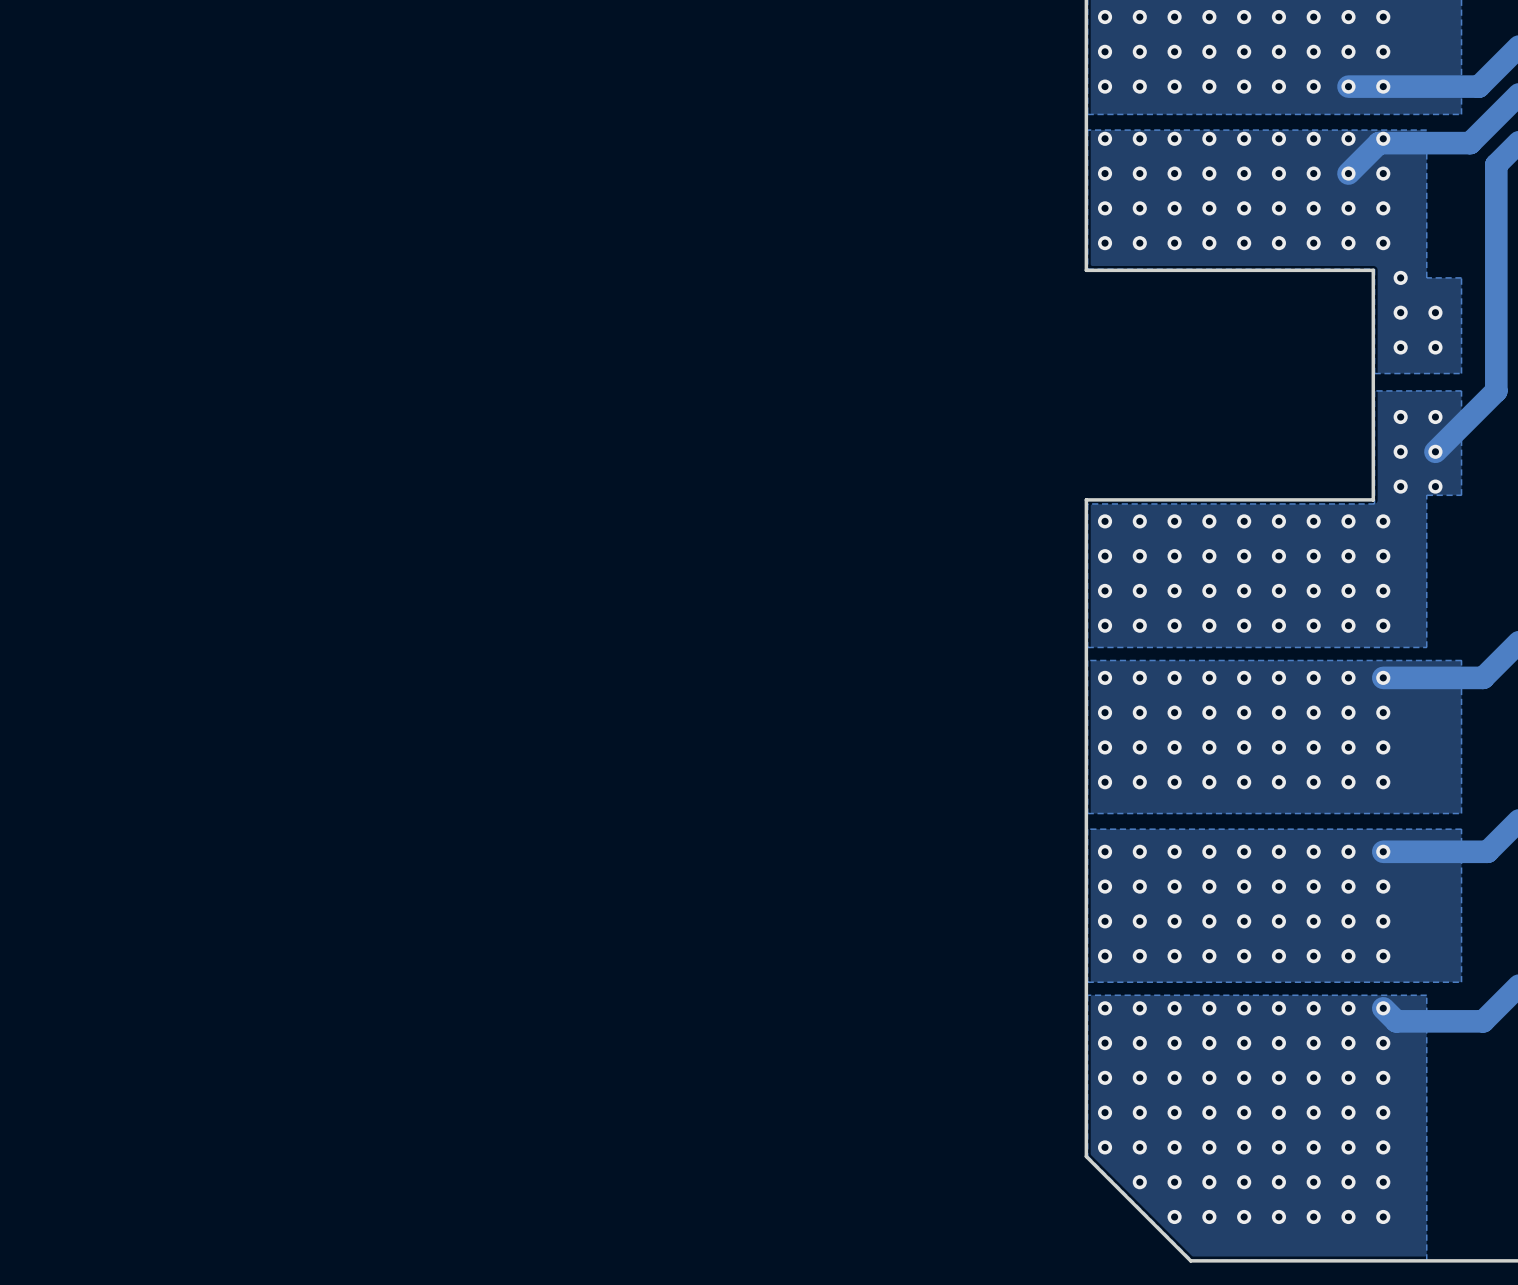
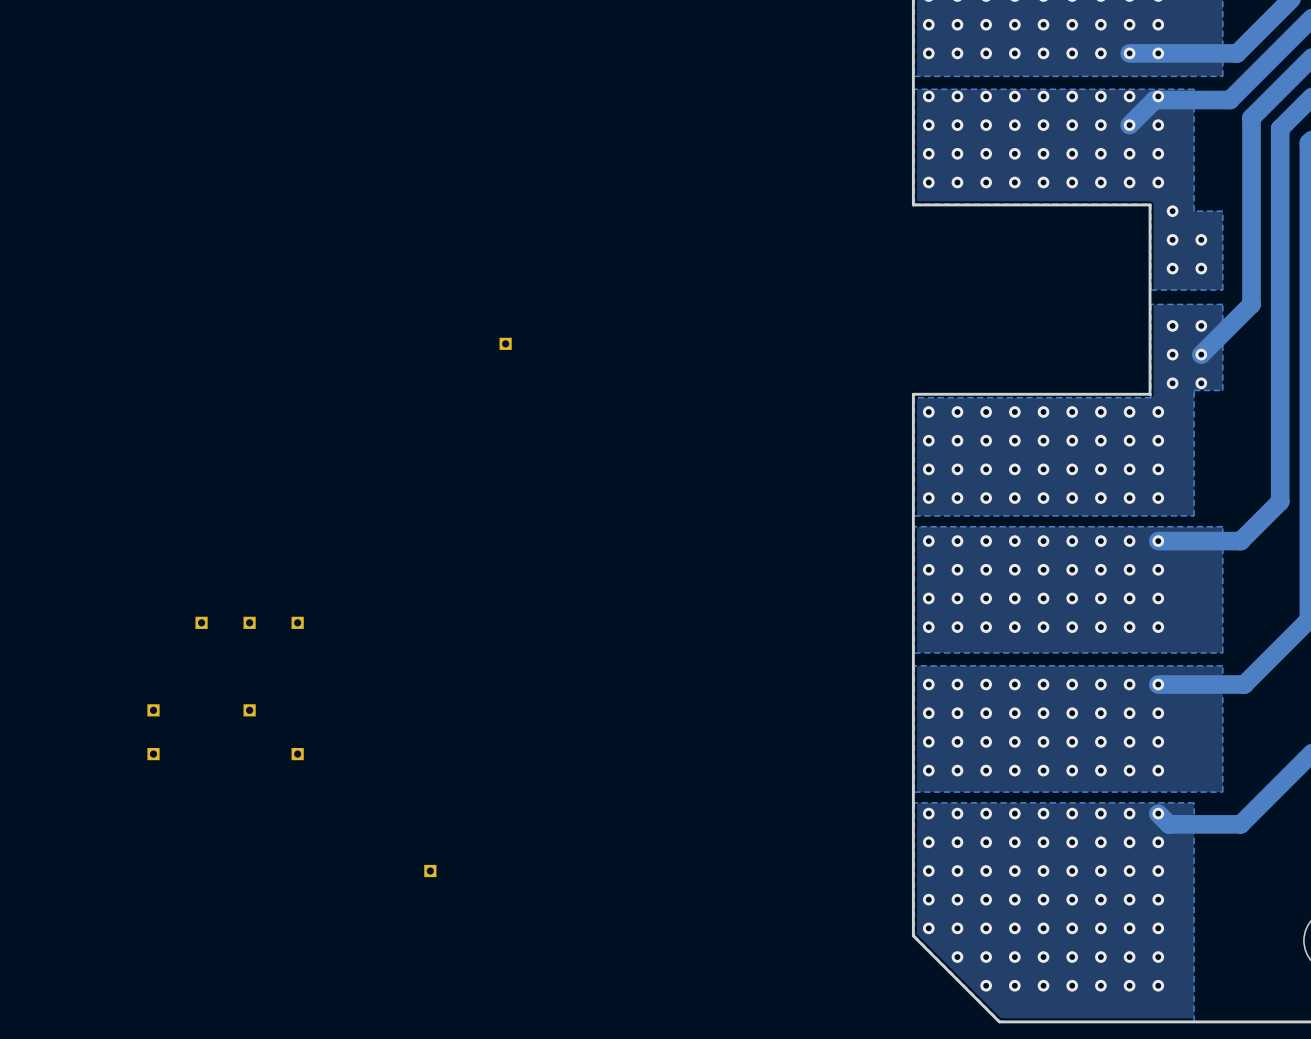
part: none -> (505, 343)
part: none -> (201, 622)
part: none -> (249, 622)
part: none -> (297, 622)
part: none -> (153, 710)
part: none -> (249, 710)
part: none -> (153, 754)
part: none -> (297, 754)
part: none -> (430, 870)

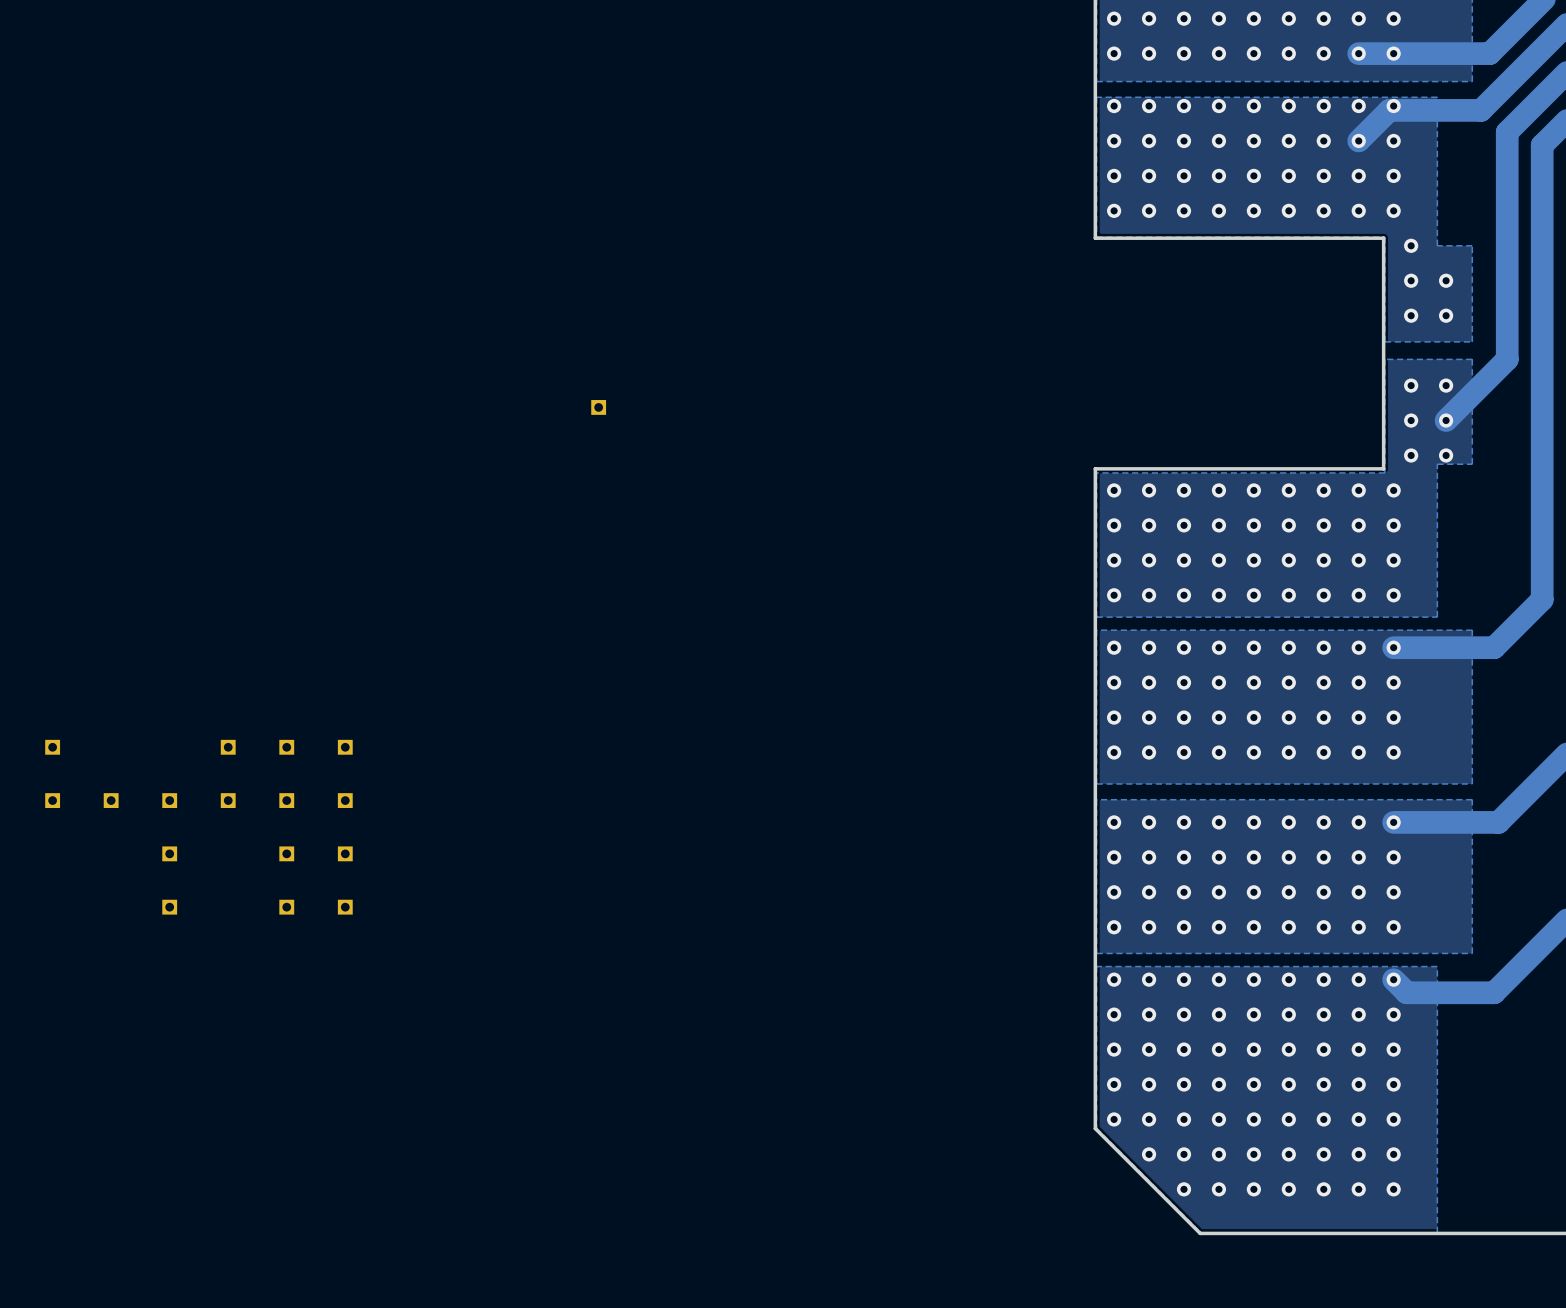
part: none -> (52, 747)
part: none -> (52, 800)
part: none -> (111, 800)
part: none -> (169, 800)
part: none -> (228, 800)
part: none -> (286, 800)
part: none -> (345, 800)
part: none -> (345, 853)
part: none -> (286, 907)
part: (430, 870) -> none

